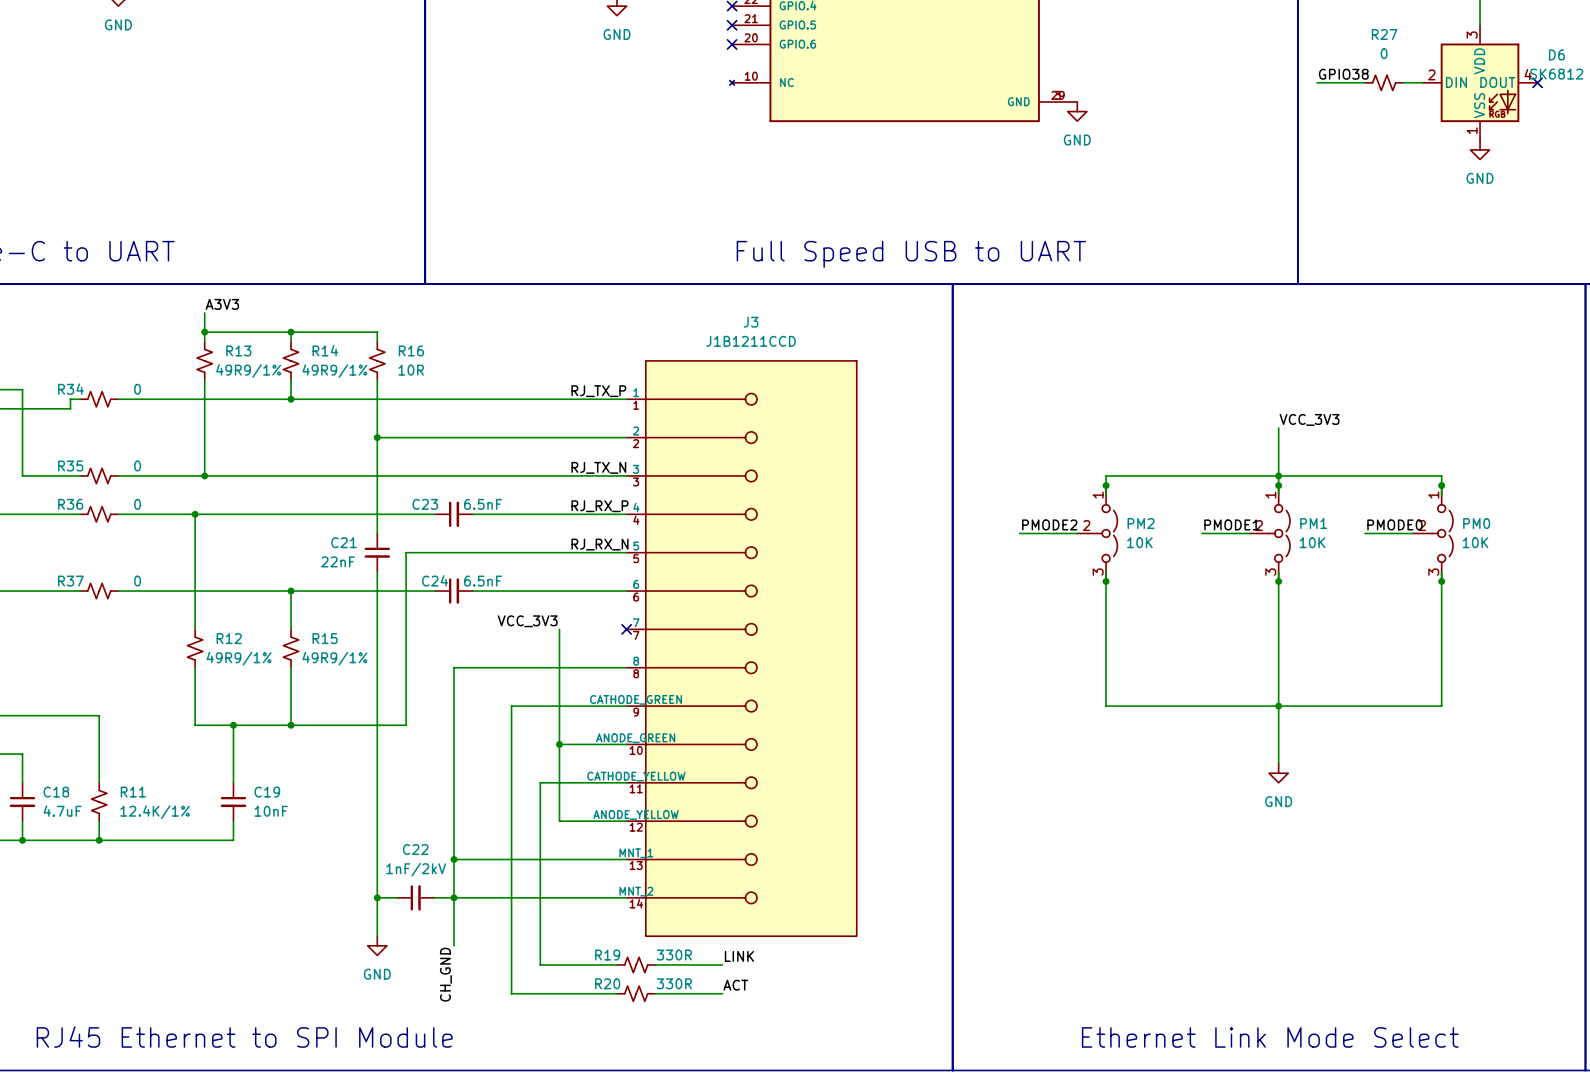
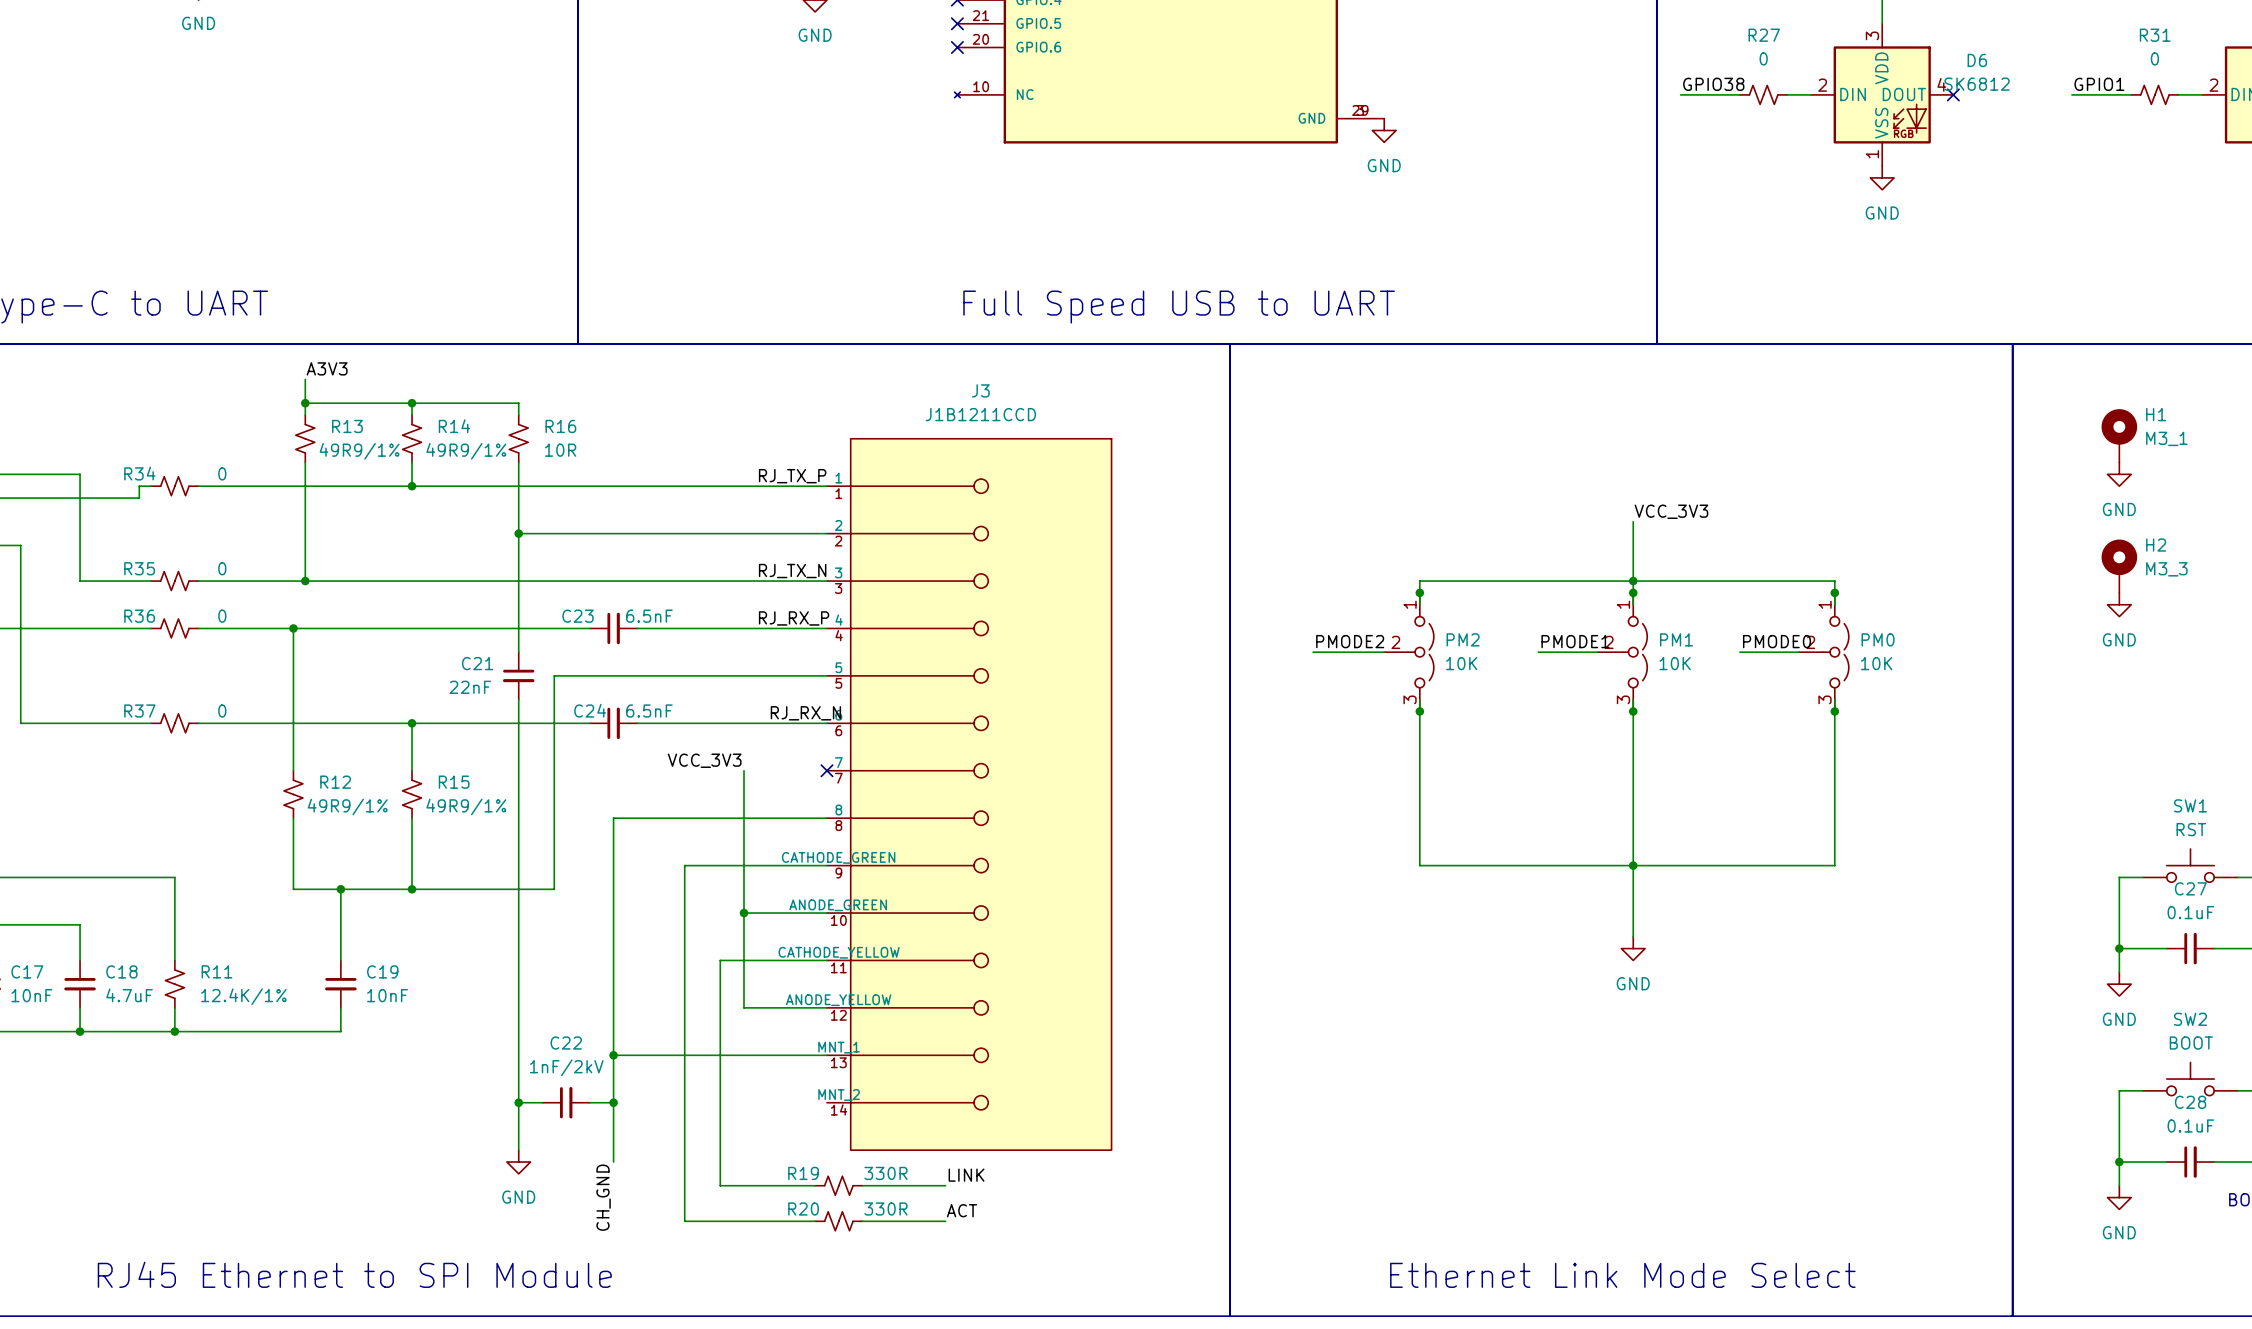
label position: RJ_RX_N (599, 544) -> RJ_RX_N (805, 713)
wire: (454, 897) (626, 897) -> none

